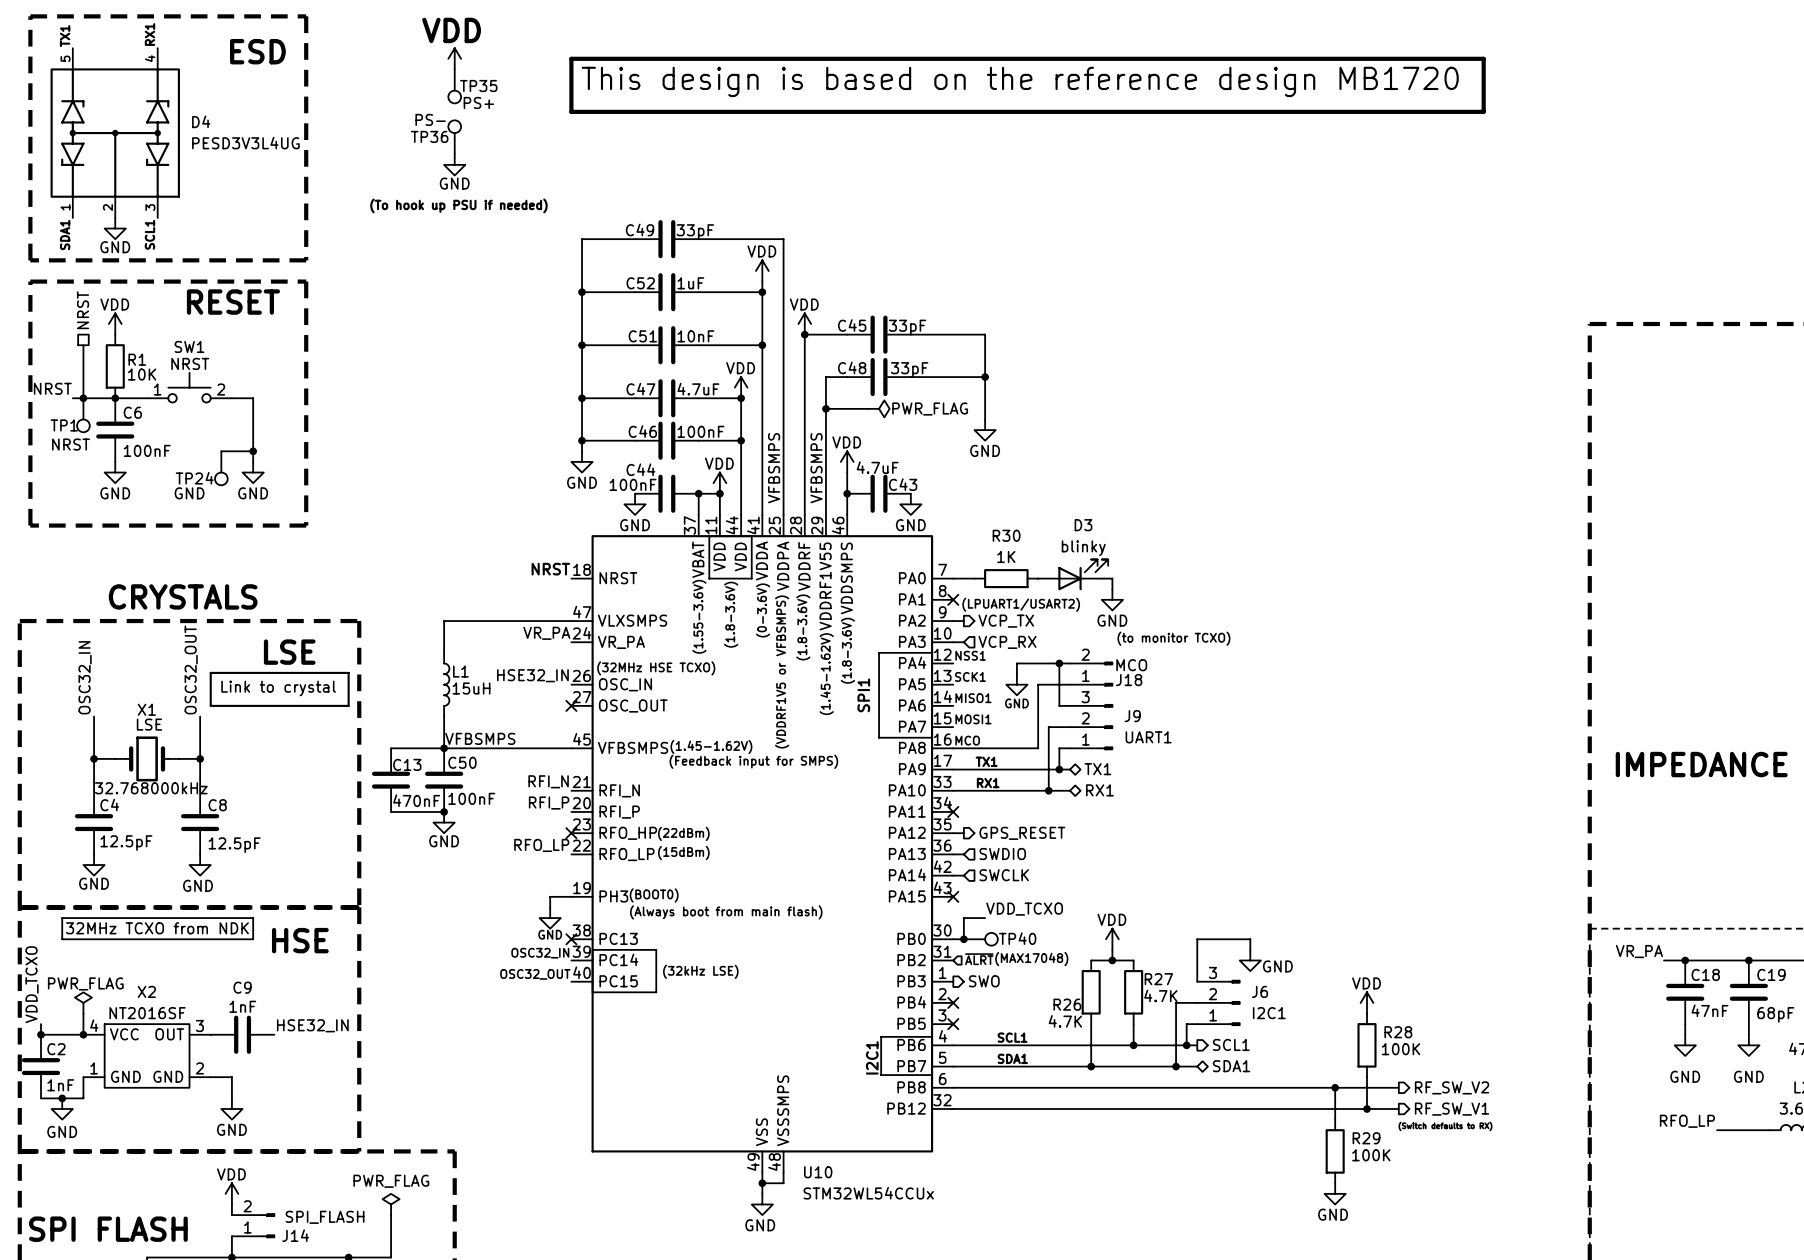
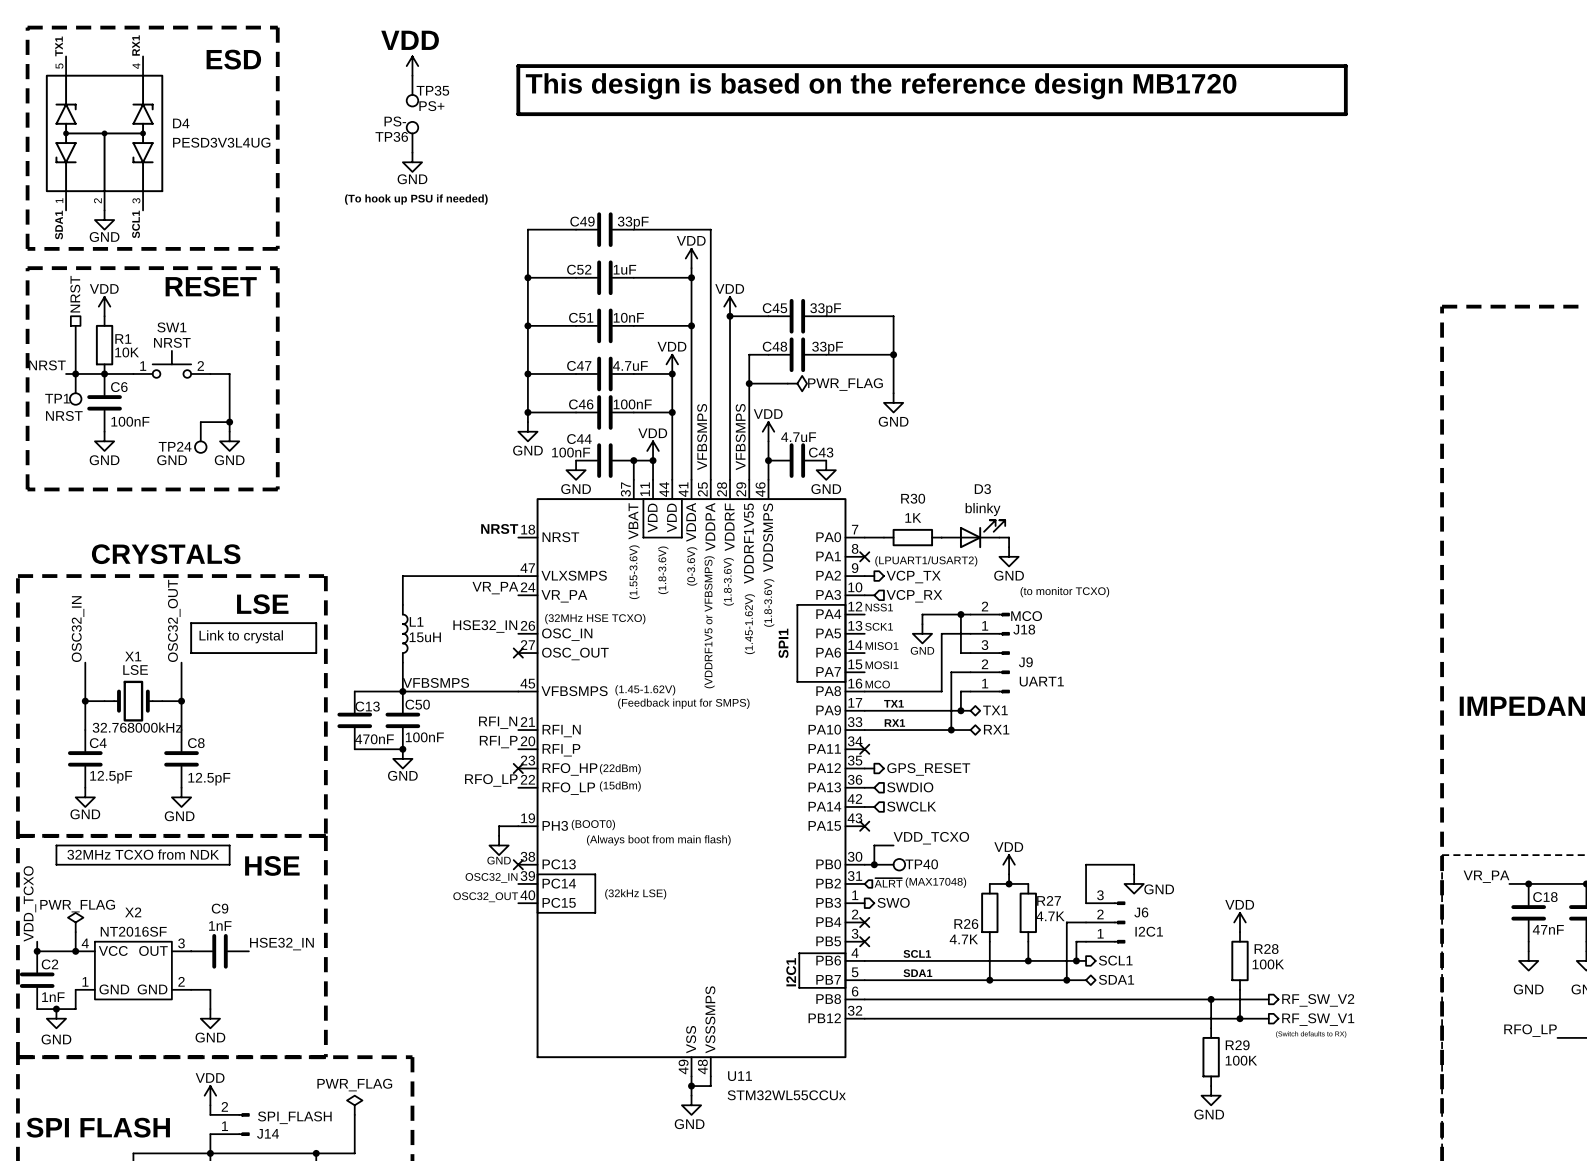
U10 name: U10 (818, 1172) -> U11 (740, 1076)
U10 value: STM32WL54CCUx (868, 1193) -> STM32WL55CCUx (786, 1095)

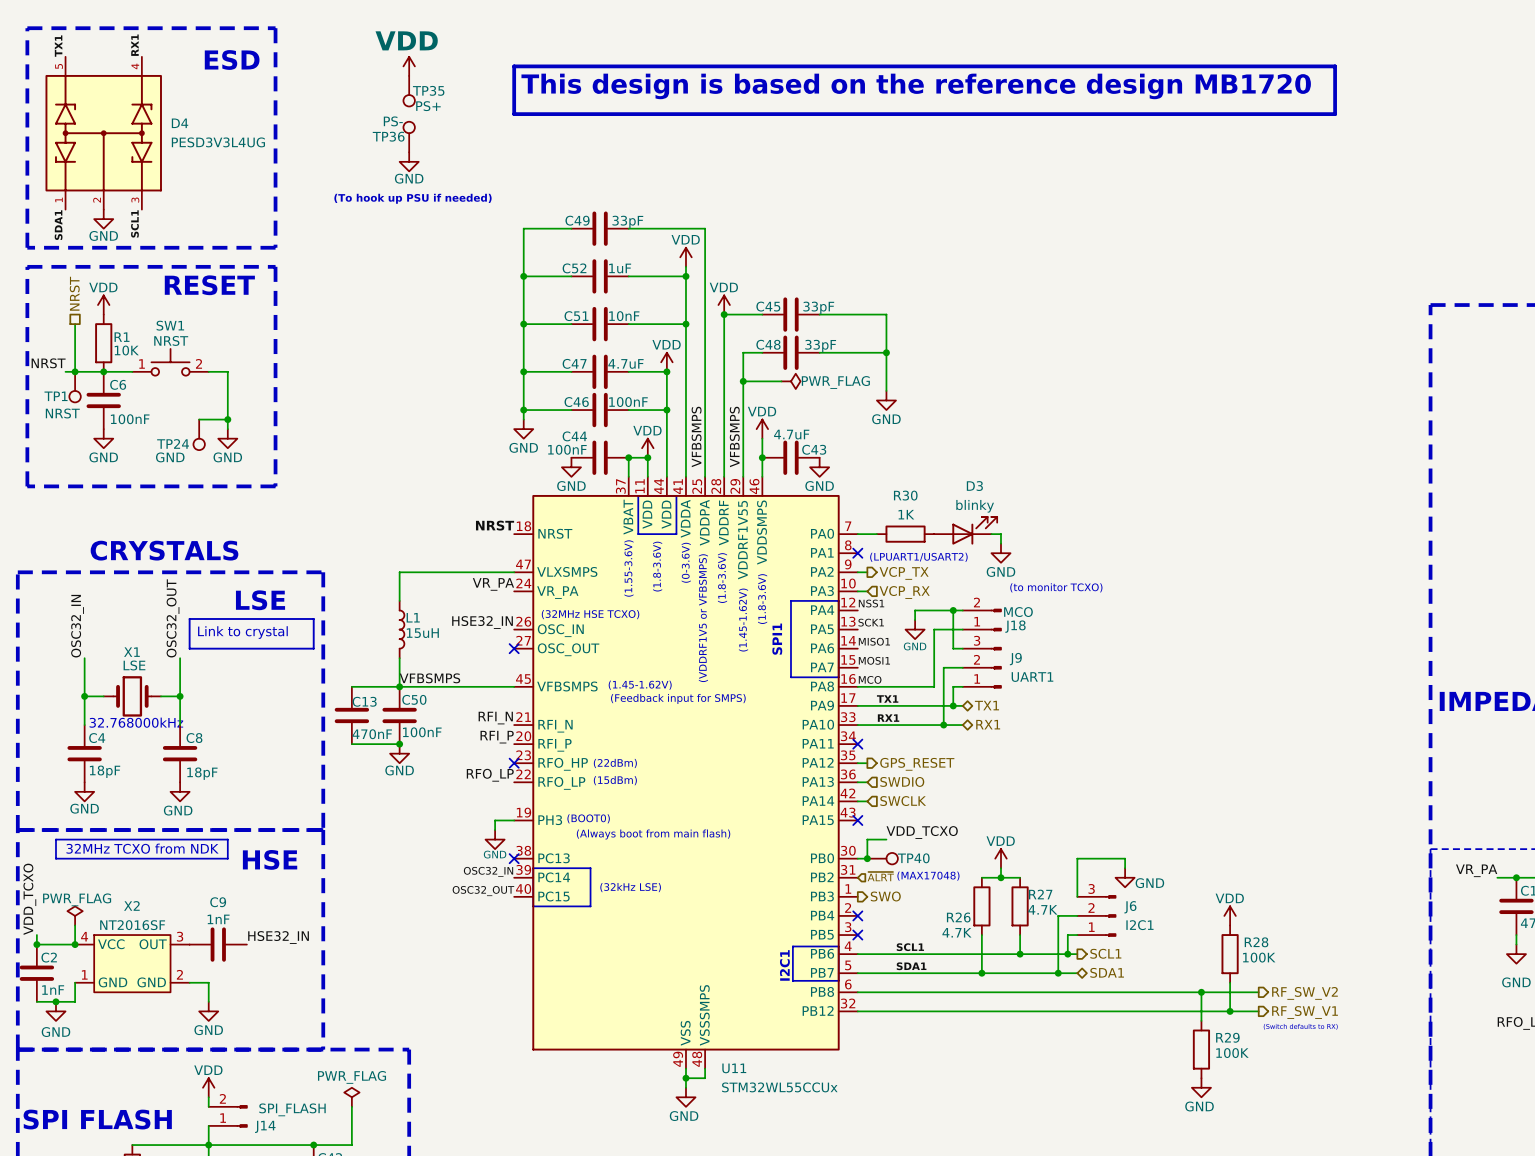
C4 value: 12.5pF (111, 777) -> 18pF (105, 771)
C8 value: 12.5pF (209, 779) -> 18pF (202, 773)

